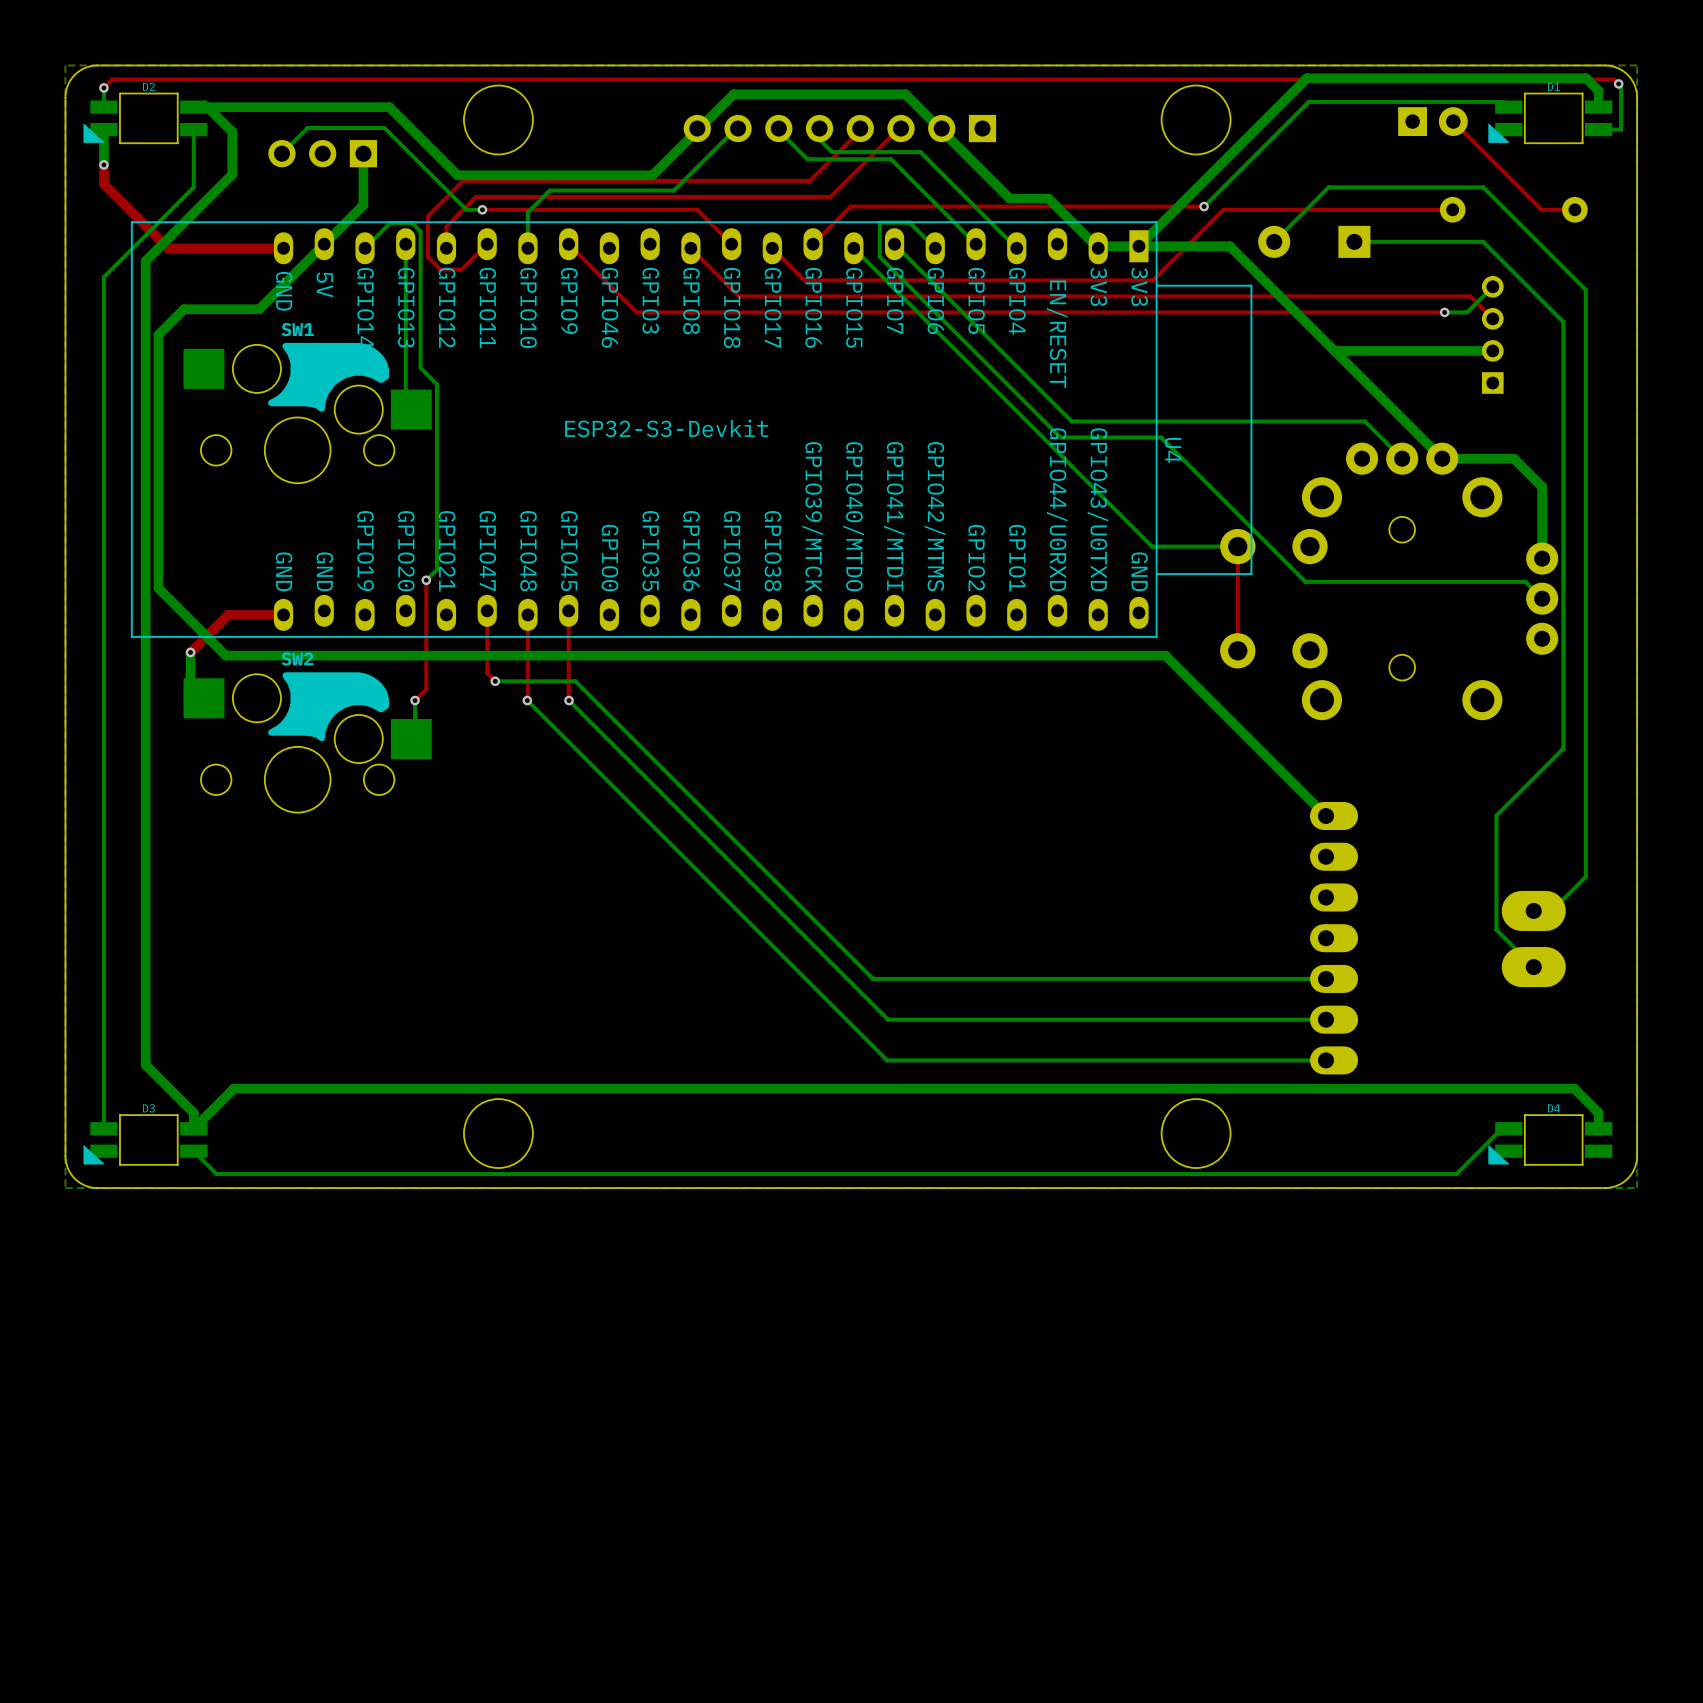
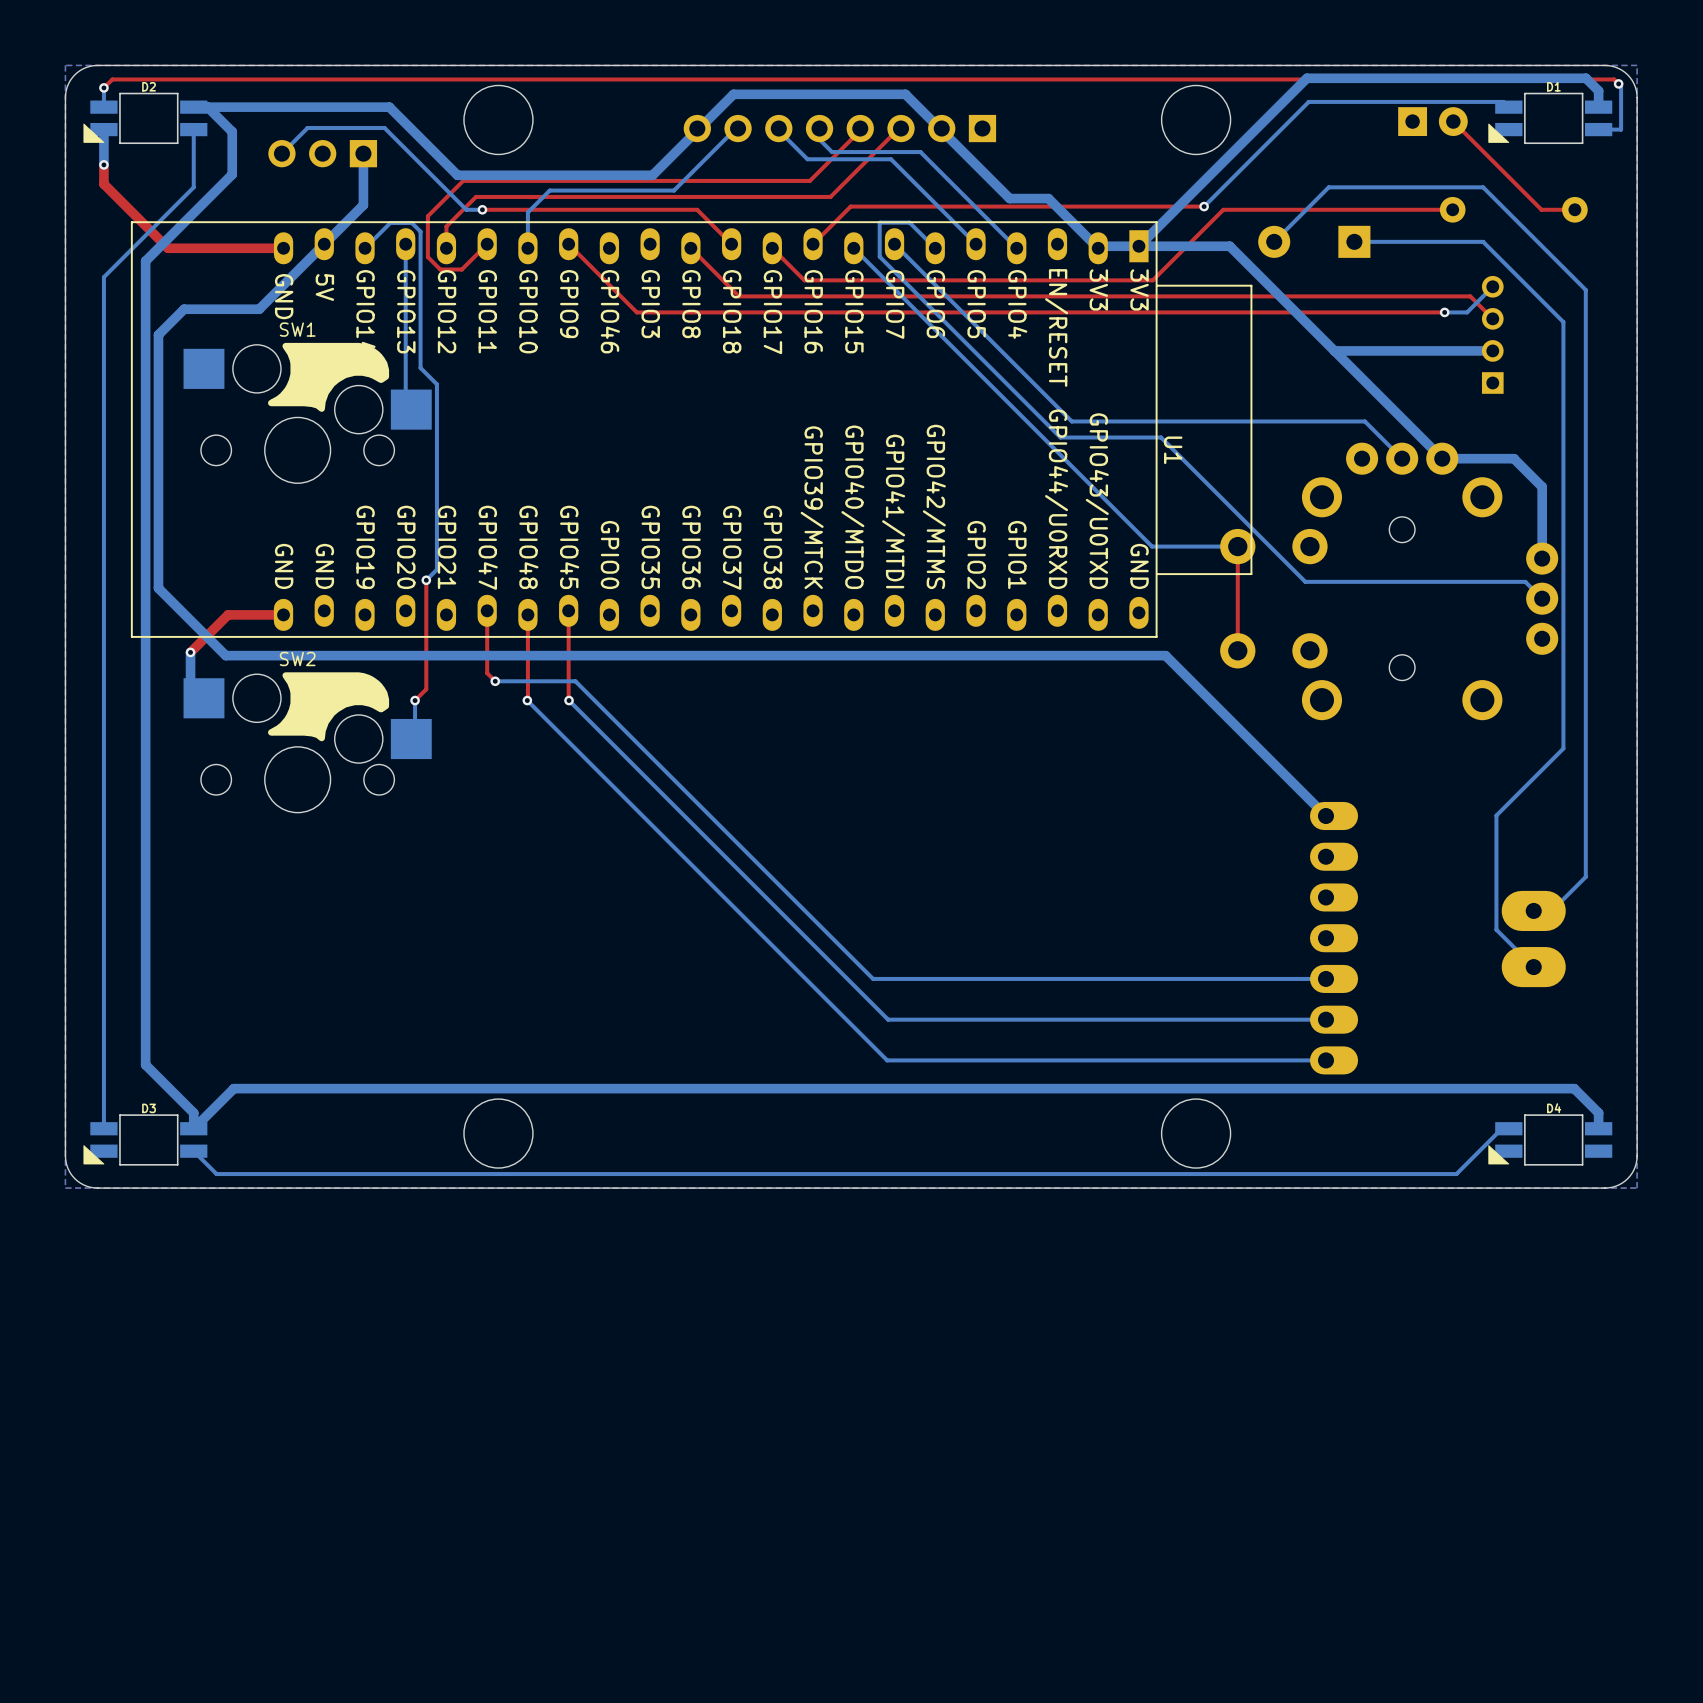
U4 value: ESP32-S3-Devkit (666, 428) -> none
U4 name: U4 (1173, 450) -> U1 (1173, 450)

